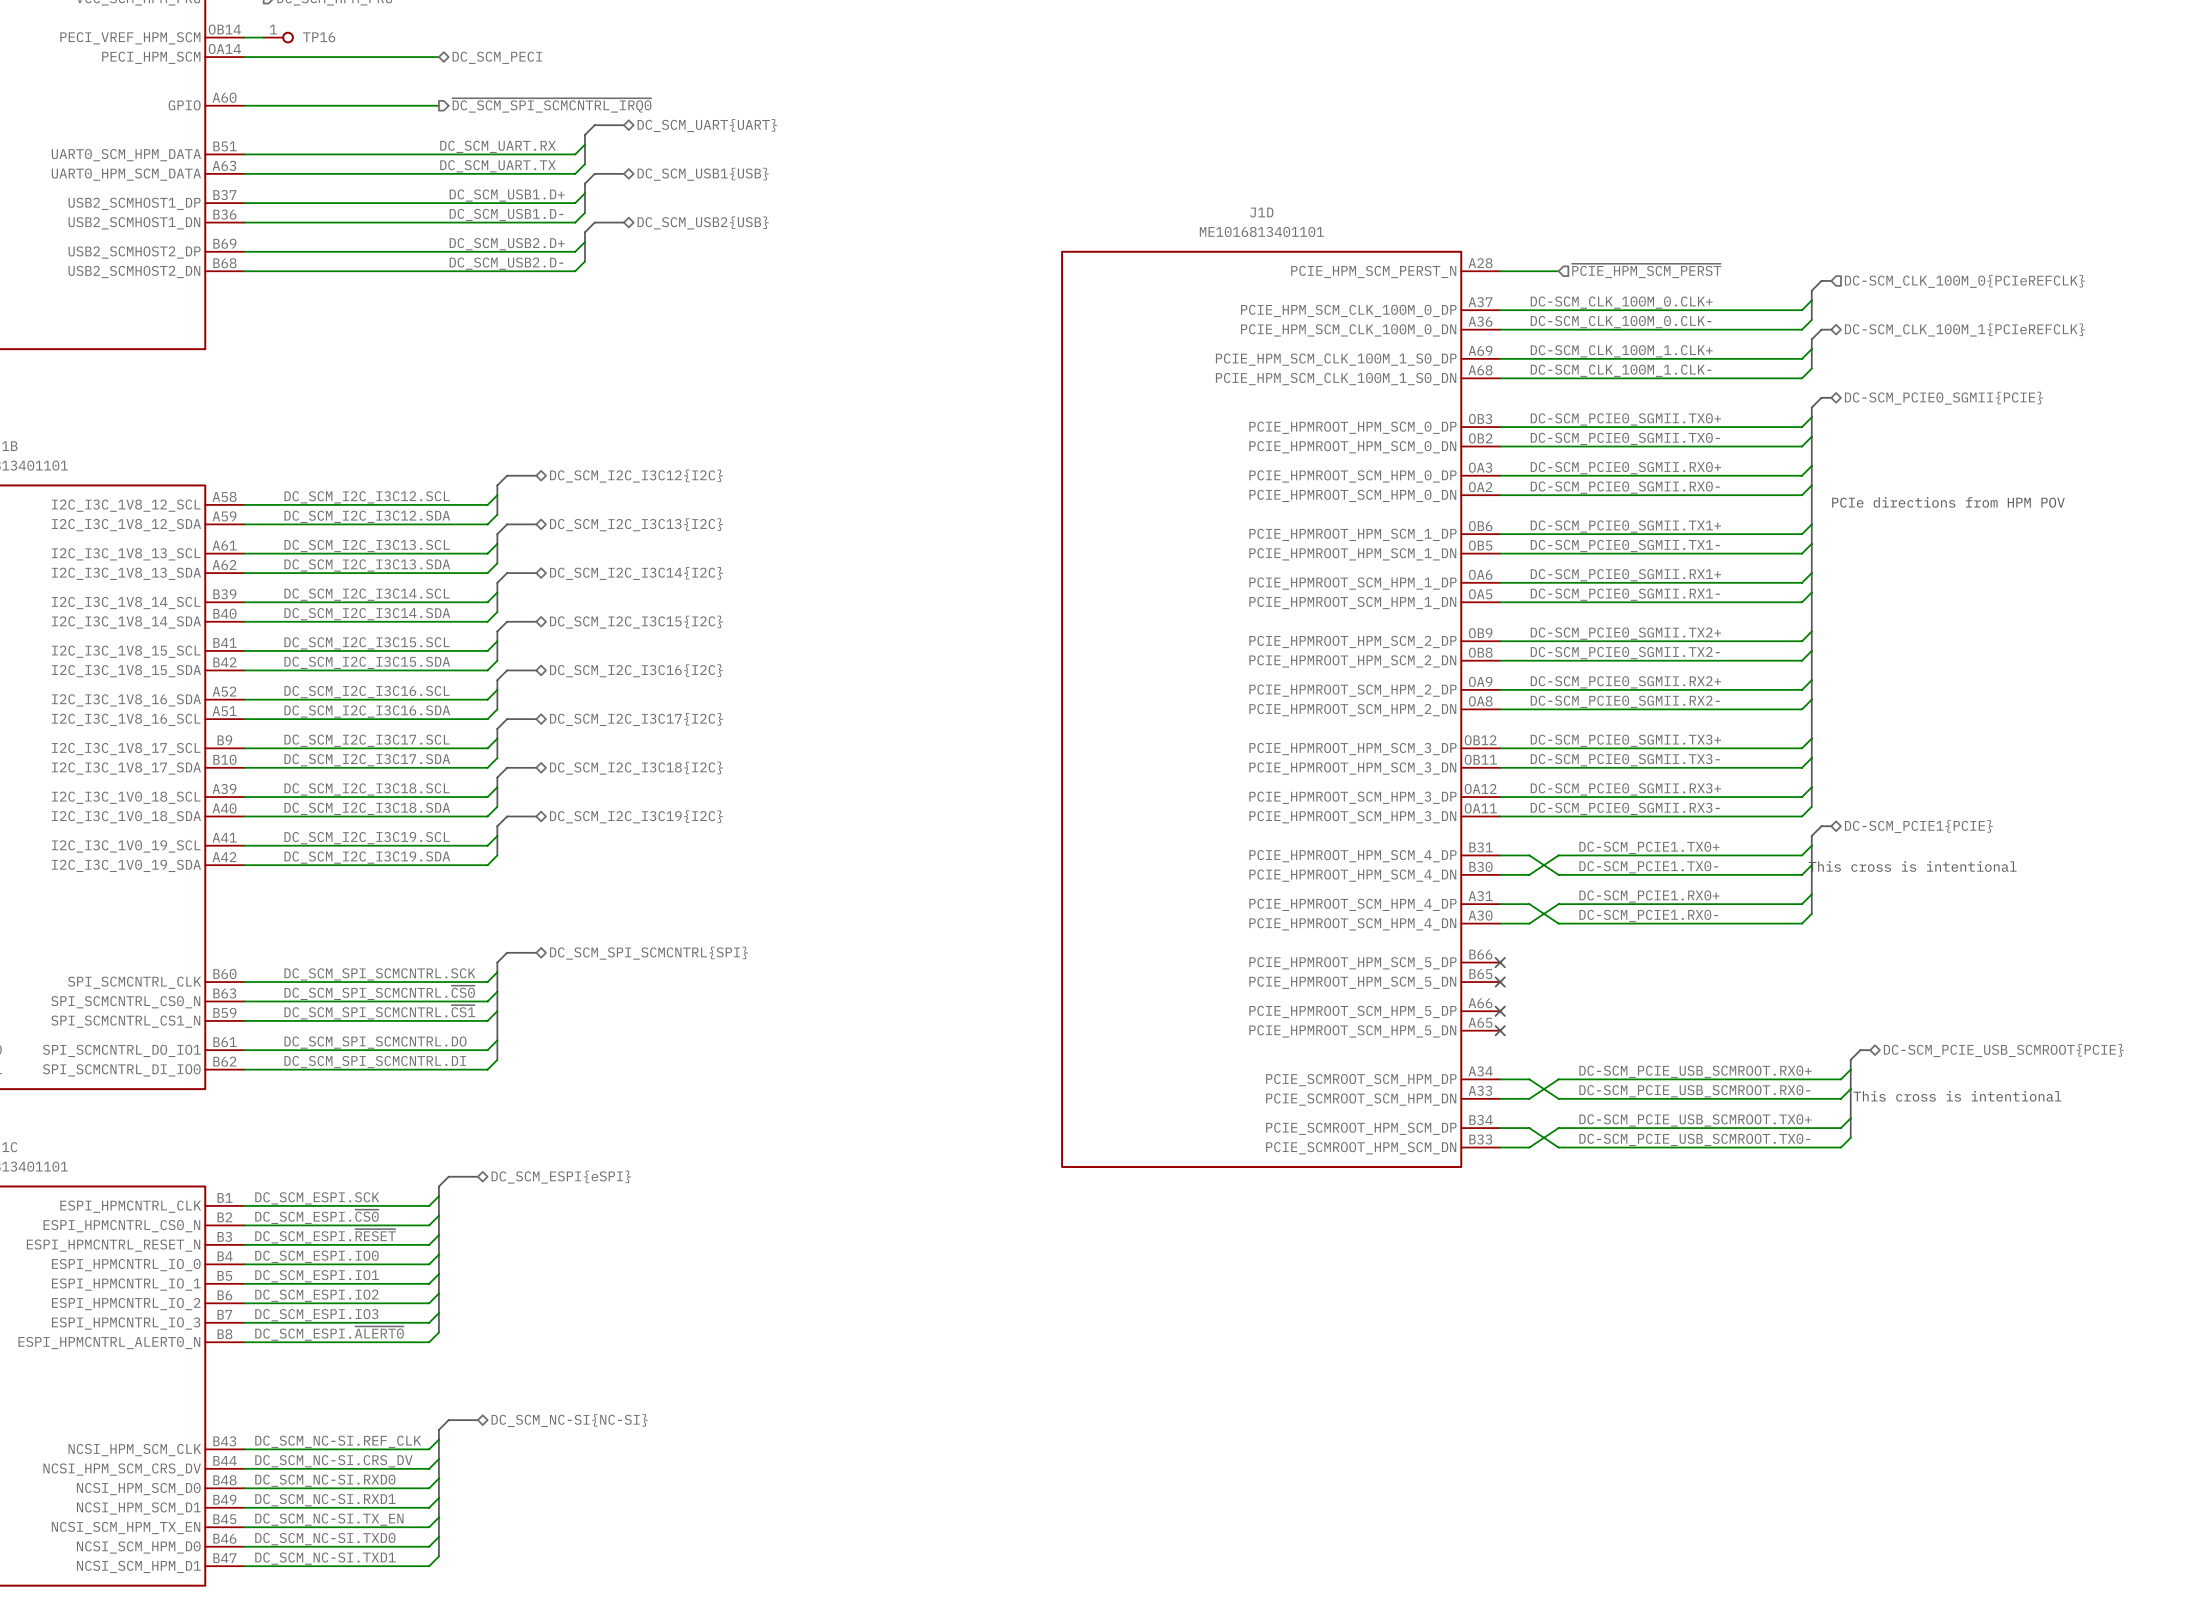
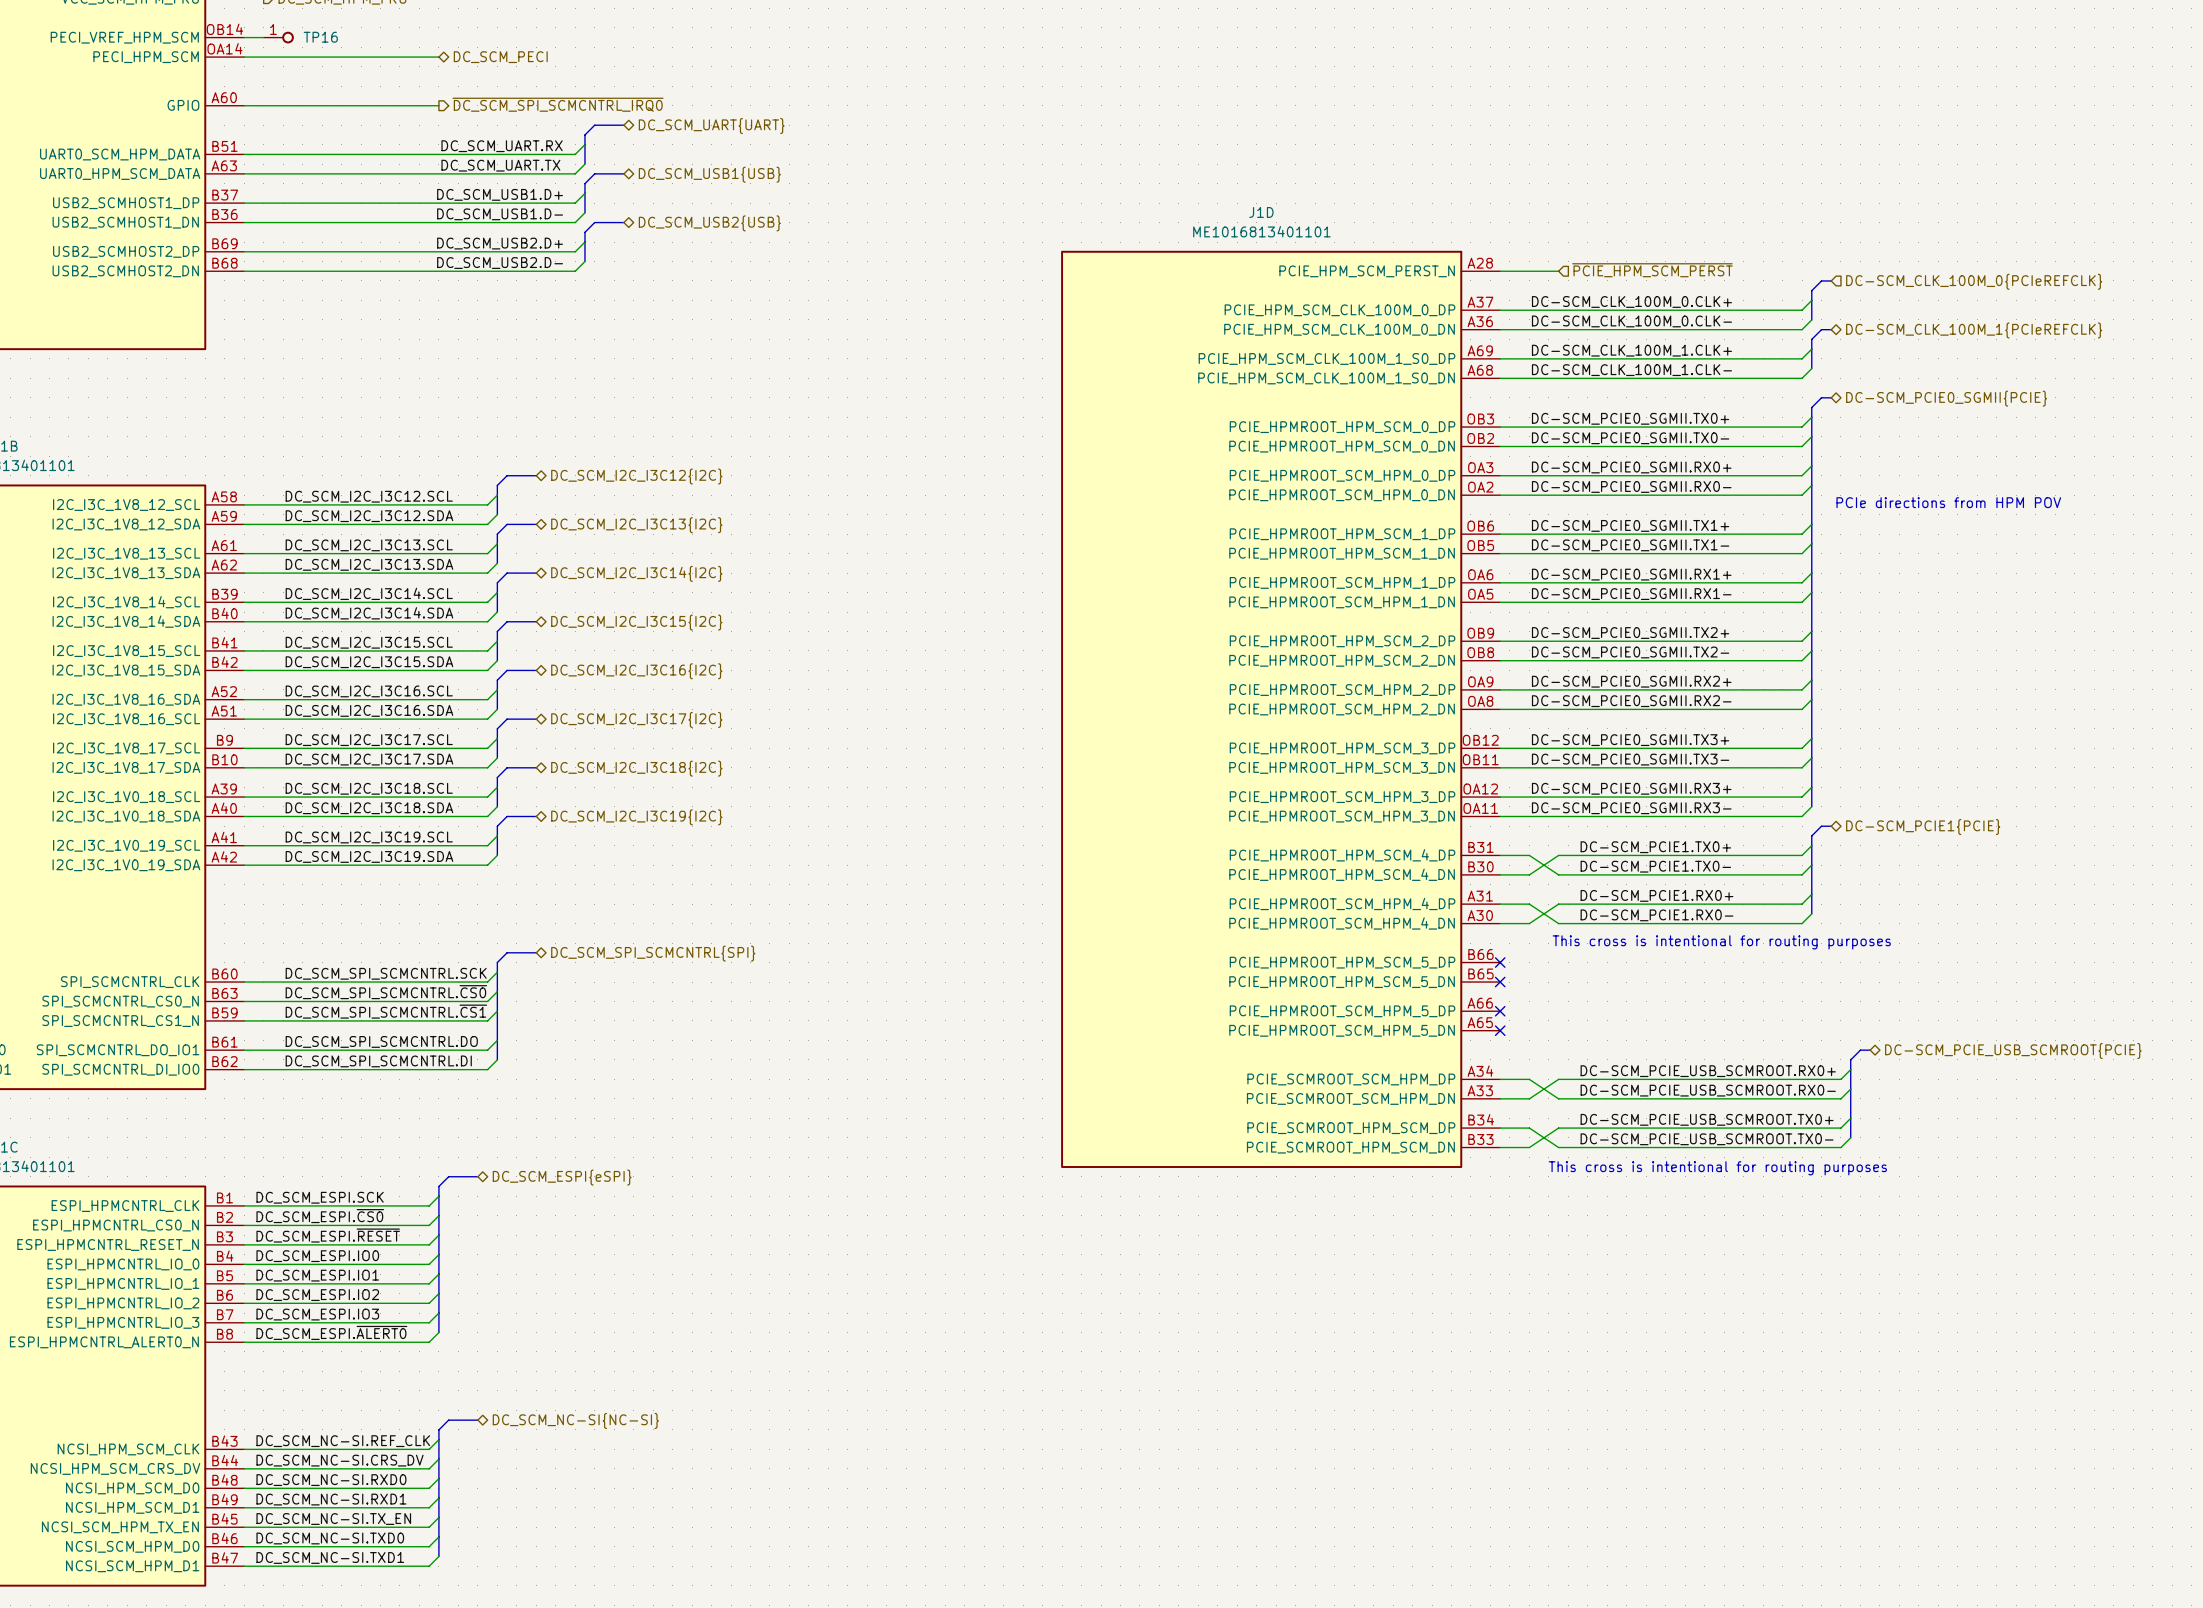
text: This cross is intentional (1912, 866) -> none
text: none -> This cross is intentional for routing purposes (1721, 942)
text: This cross is intentional (1957, 1096) -> none
text: none -> This cross is intentional for routing purposes (1717, 1168)

